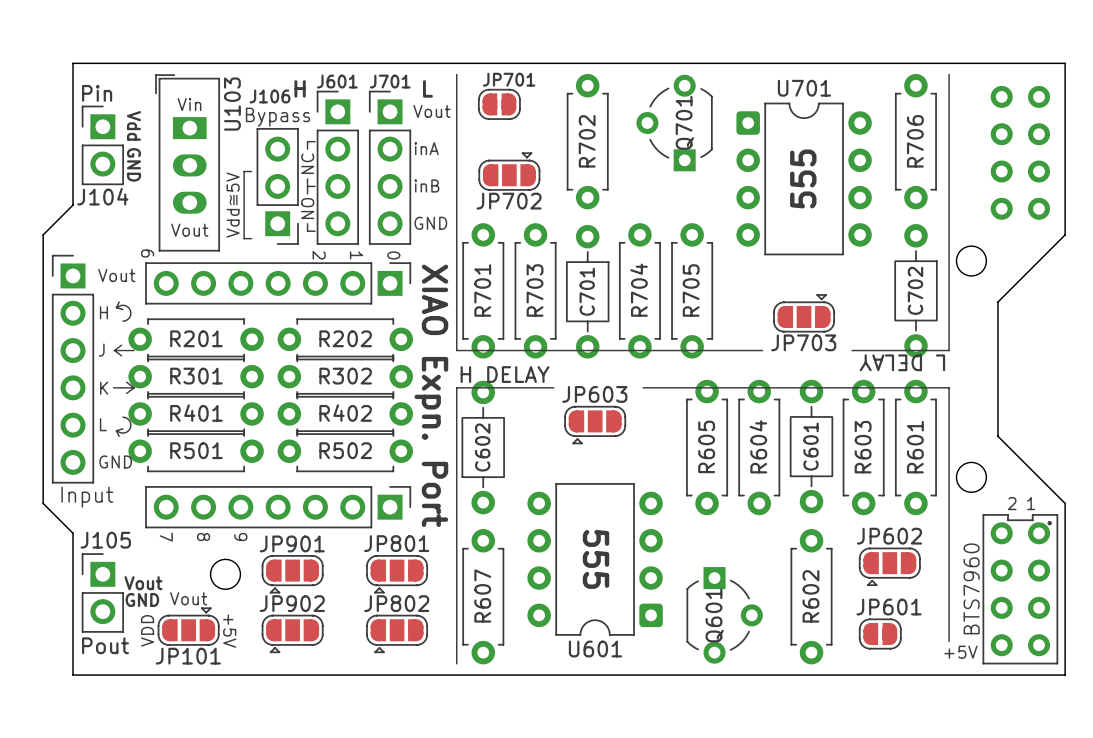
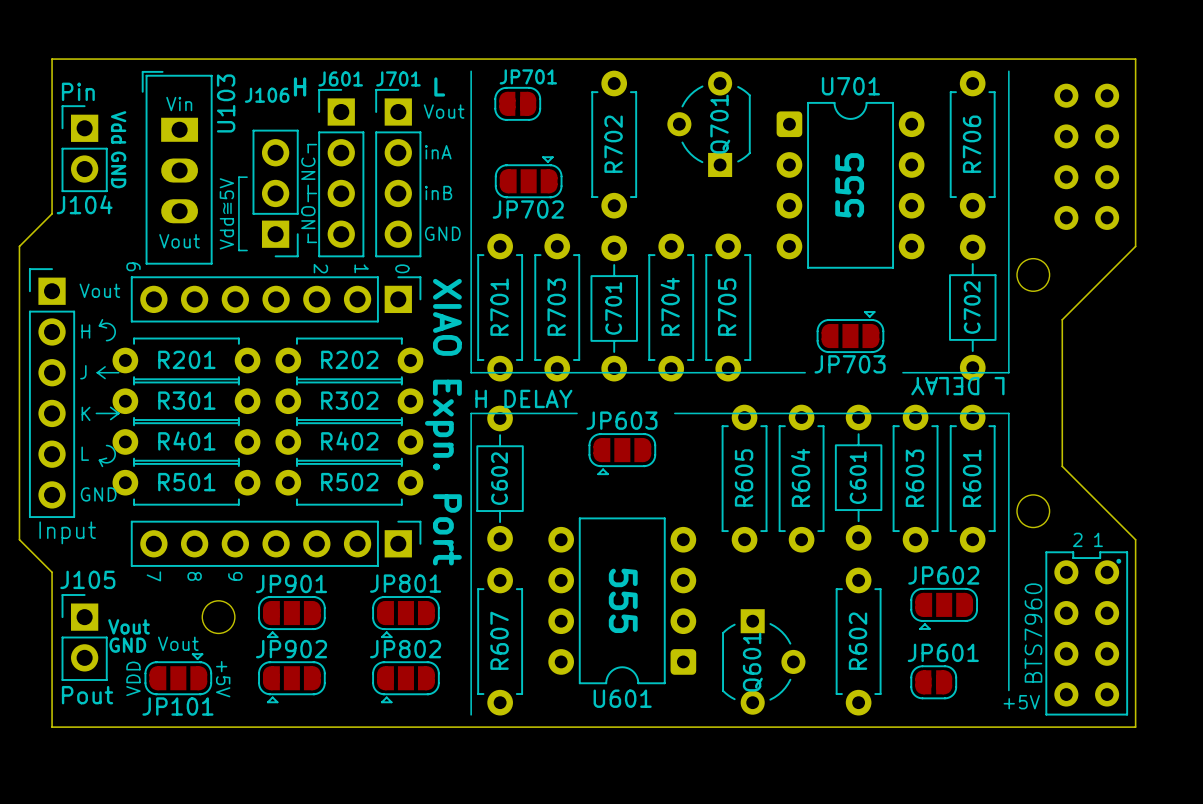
text: Bypass (278, 117) -> none

